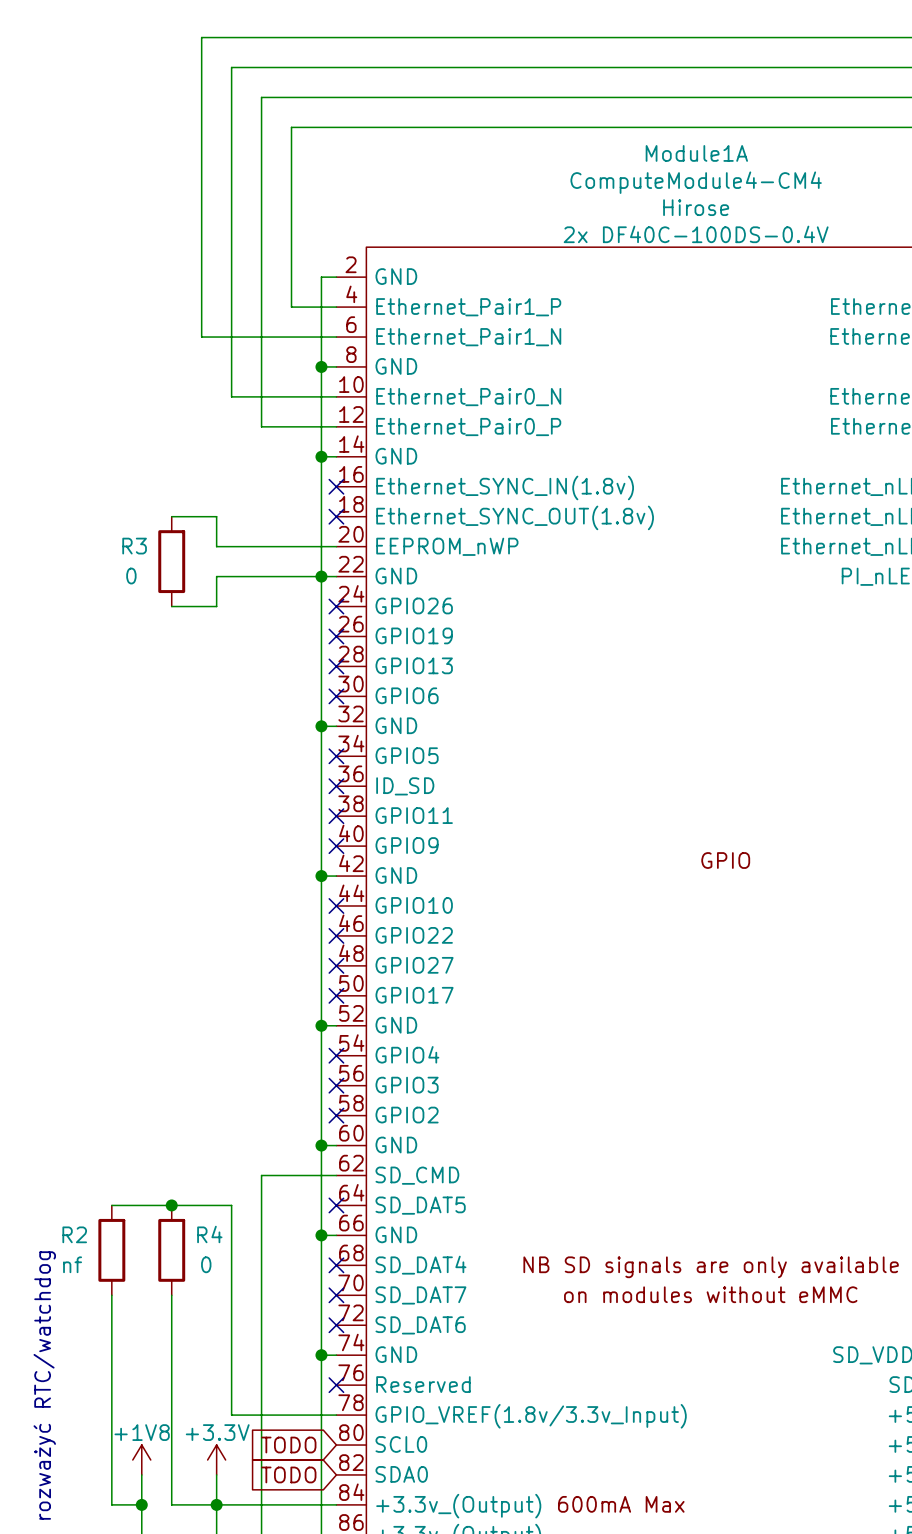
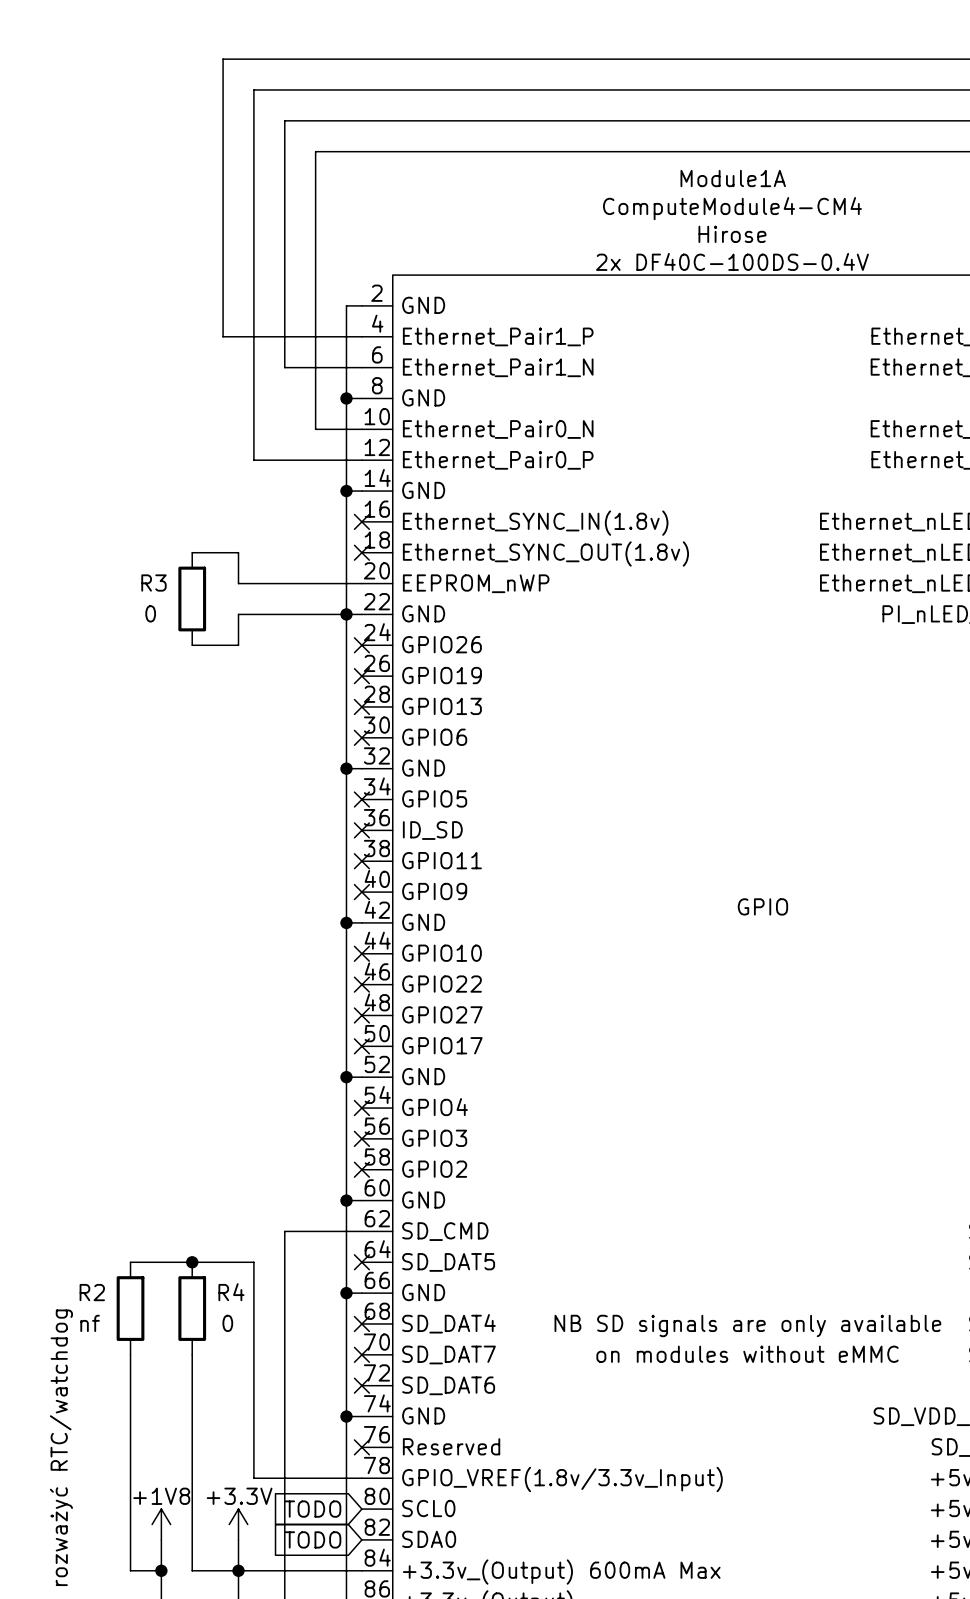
wire: (201, 307) (201, 337) (261, 337) (261, 426) -> (223, 336) (315, 336) (315, 429)
wire: (231, 396) (291, 396) -> (253, 429) (253, 460) (284, 460)

